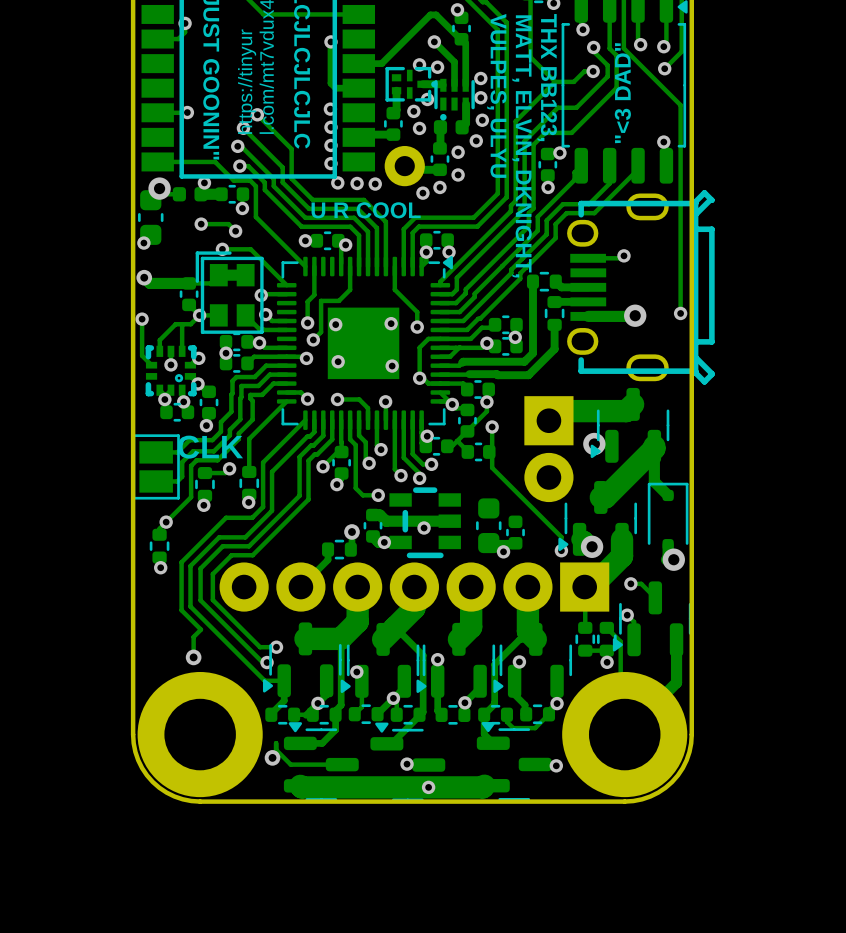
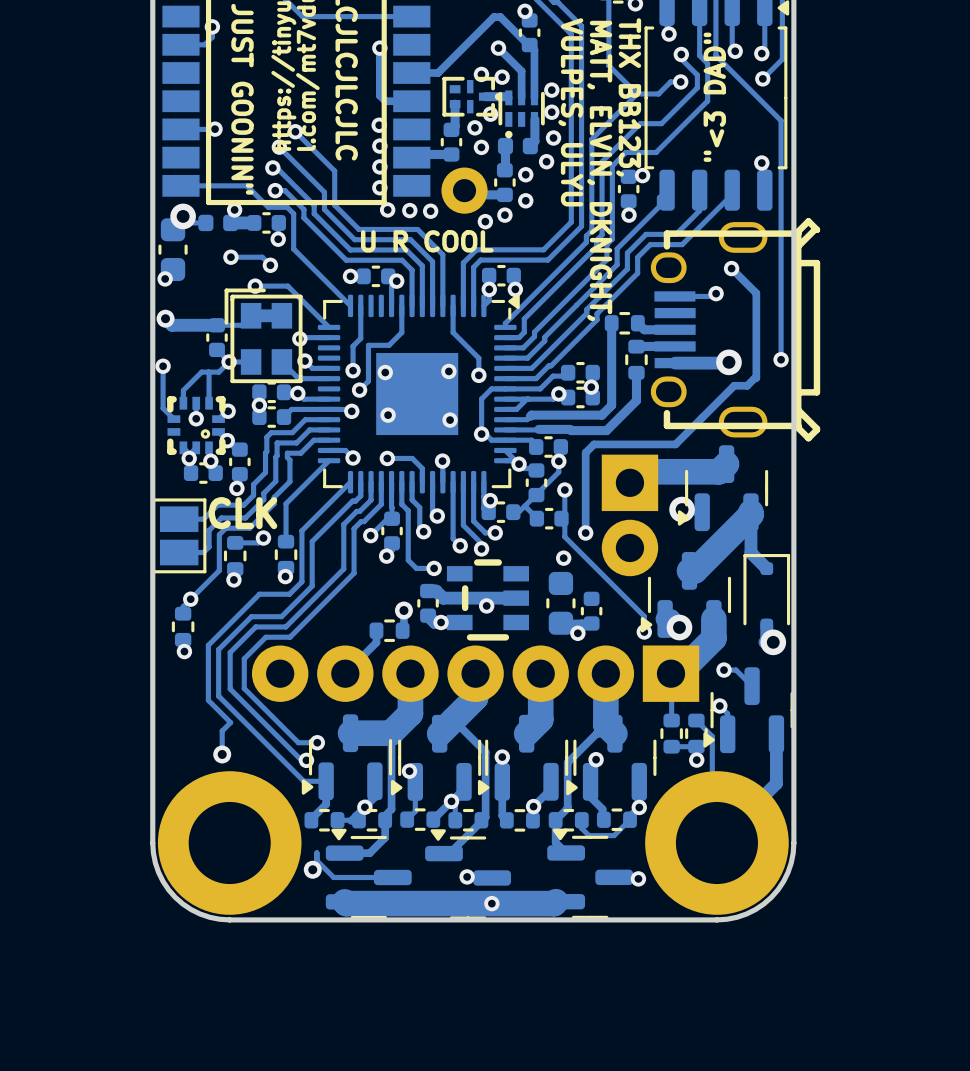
track: none -> (731, 268) (756, 293) (756, 377) (747, 385) (734, 385) (675, 444) (594, 444) (585, 452) (586, 534)
via: none -> (731, 268)
via: none -> (585, 533)
via: none -> (563, 558)

